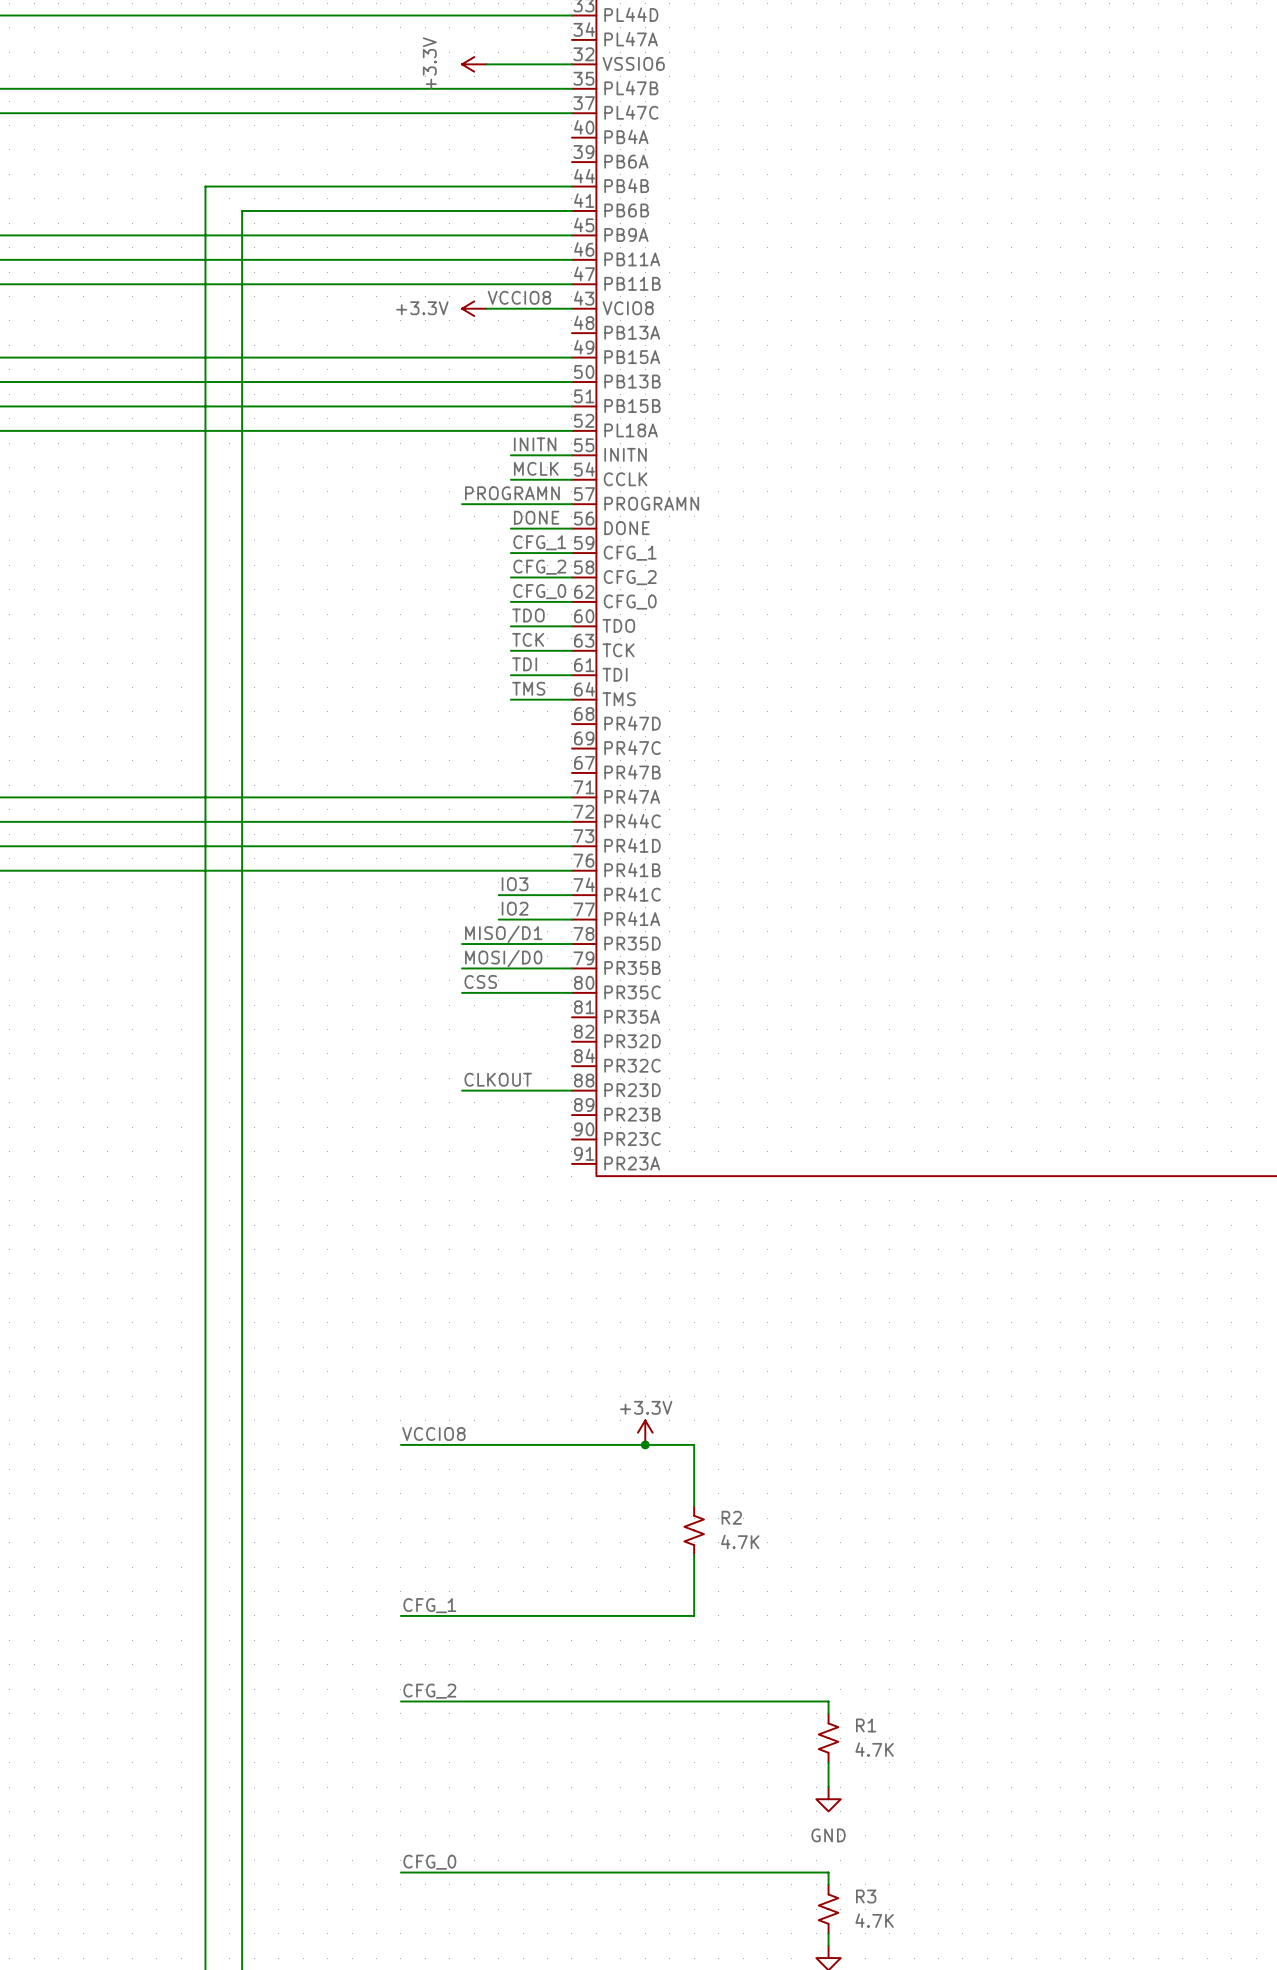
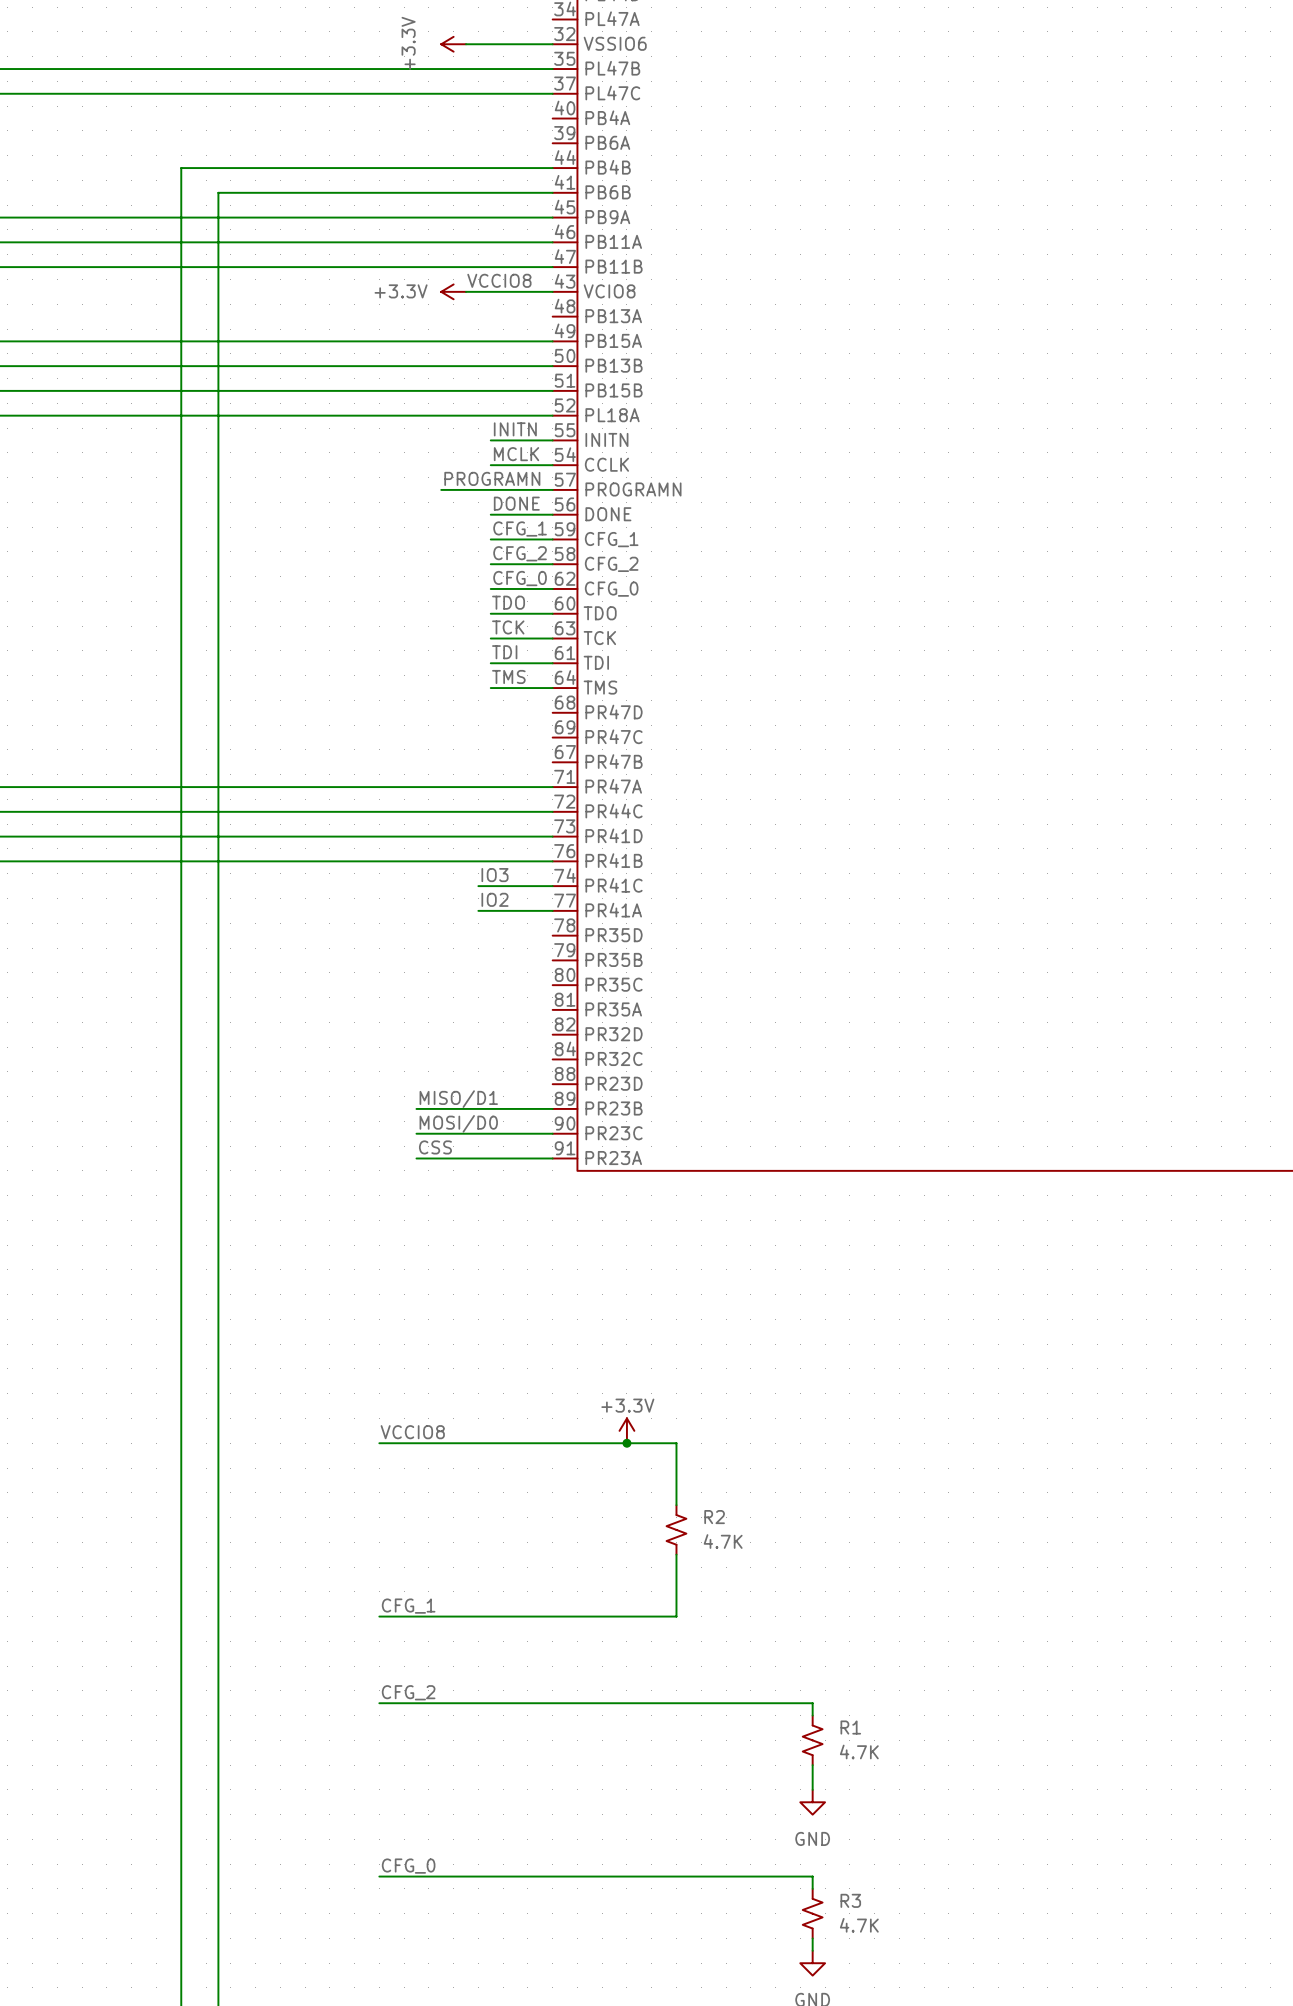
label position: MISO/D1 (503, 934) -> MISO/D1 (458, 1099)
wire: (462, 944) (571, 944) -> none
label position: MOSI/D0 (503, 958) -> MOSI/D0 (458, 1123)
wire: (462, 968) (571, 968) -> none
label position: CSS (480, 981) -> CSS (435, 1147)
wire: (462, 992) (571, 992) -> none
label: CLKOUT (498, 1079) -> none
wire: (462, 1090) (571, 1090) -> none
wire: none -> (416, 1108) (552, 1108)
wire: none -> (416, 1133) (552, 1133)
wire: none -> (416, 1158) (552, 1158)

